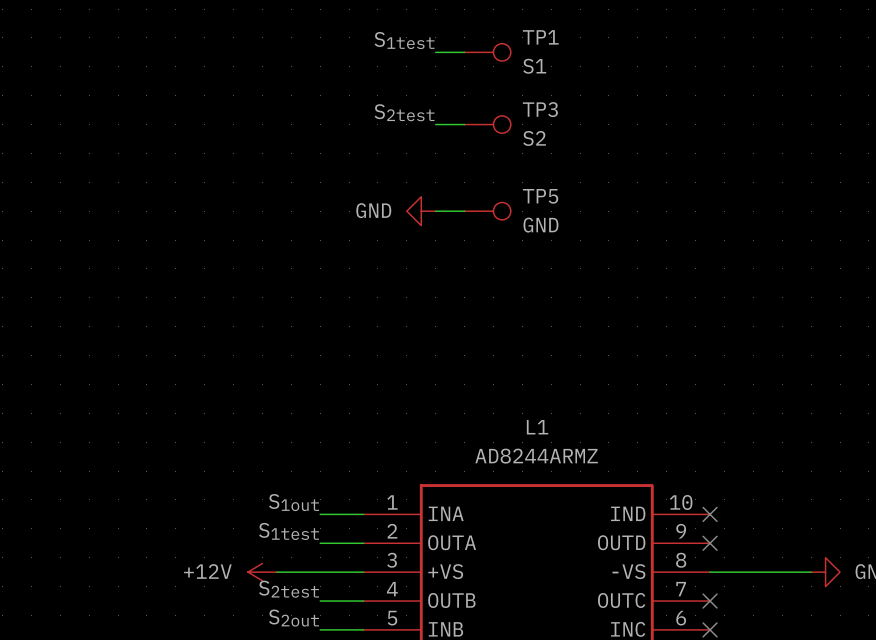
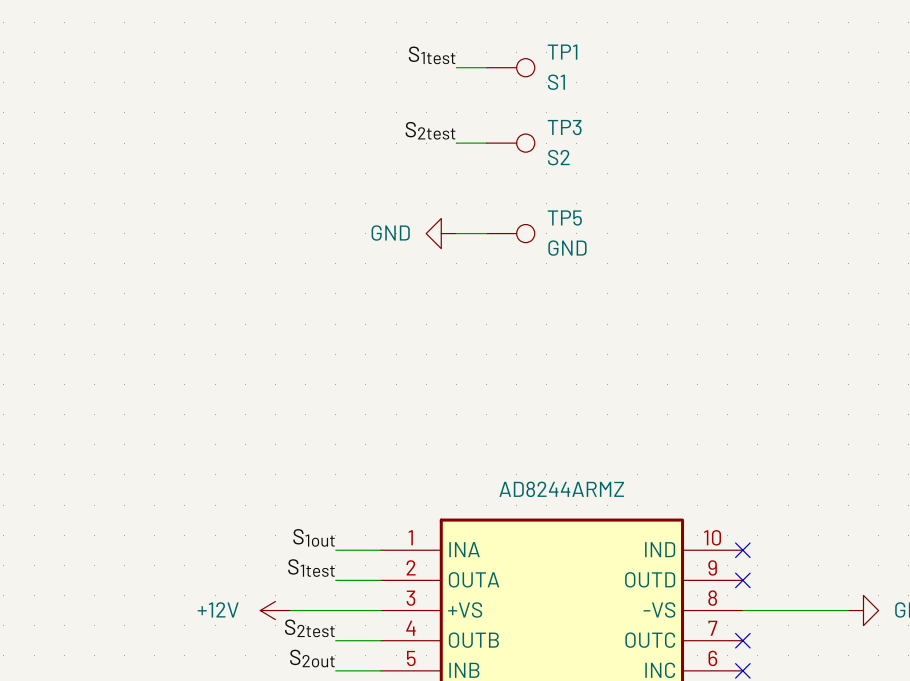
L1 name: L1 (537, 427) -> none

